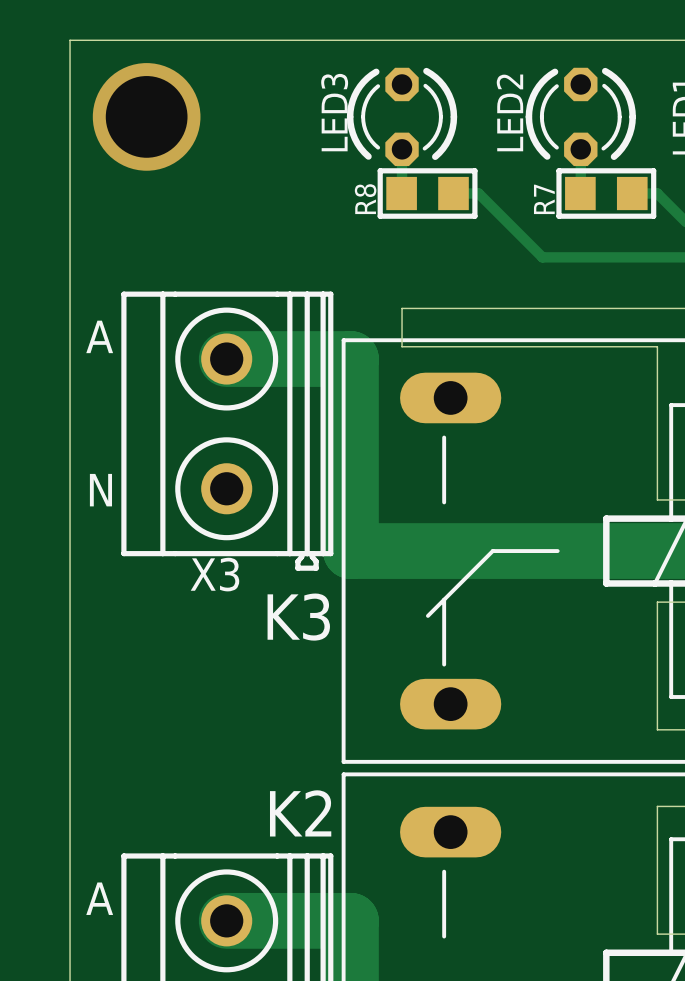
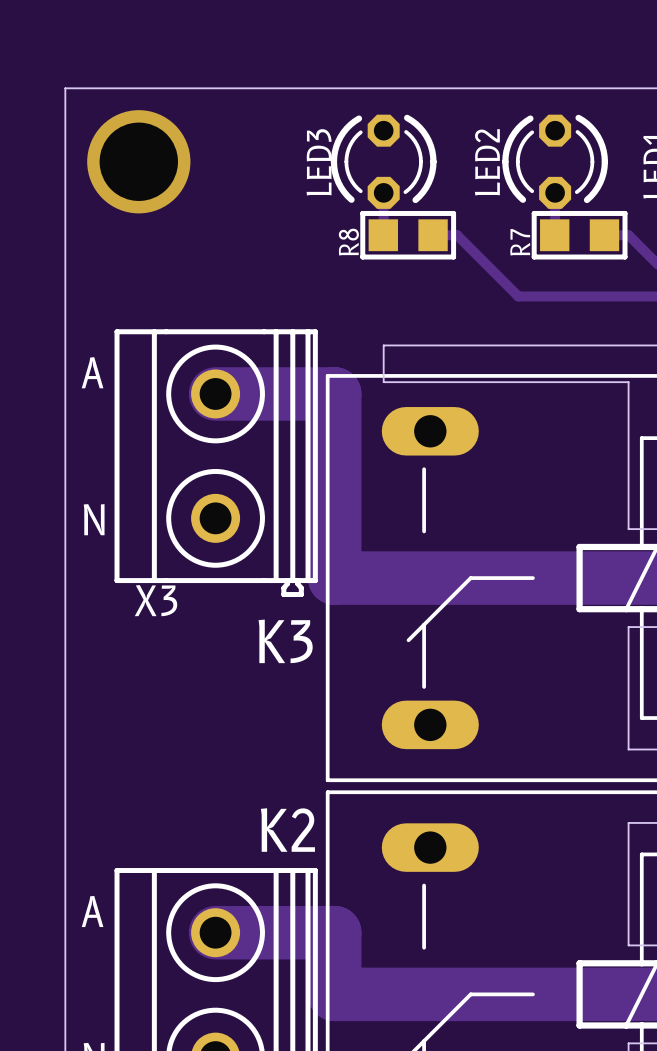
X3 name position: X3 (214, 574) -> X3 (156, 600)

